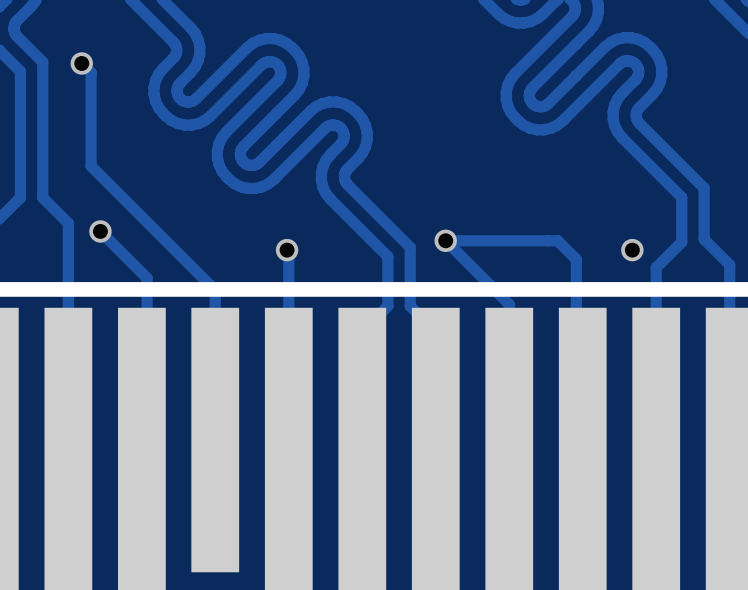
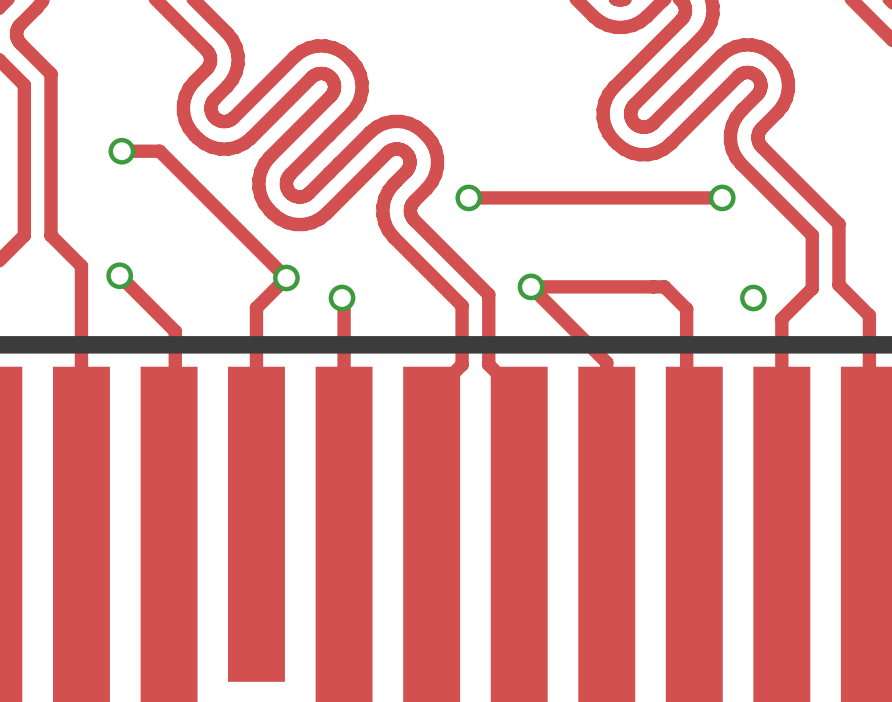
track: (81, 63) (91, 72) (91, 166) (215, 290) -> (121, 151) (159, 151) (286, 277) (256, 307) (256, 345)
via position: (81, 63) -> (121, 151)
track: none -> (468, 197) (722, 197)
via: none -> (468, 197)
via: none -> (722, 197)
via: none -> (286, 277)

